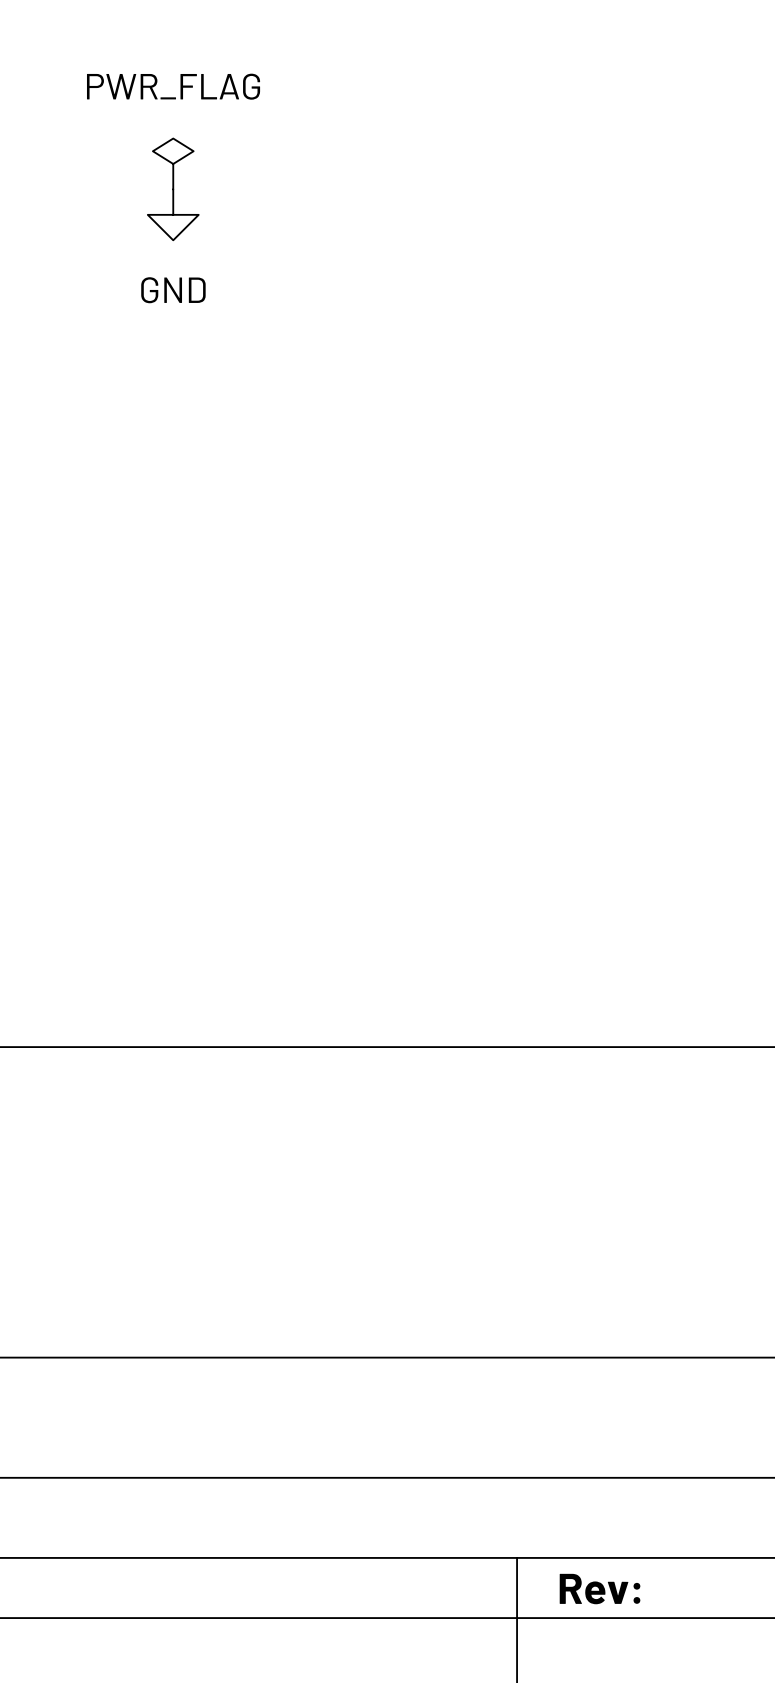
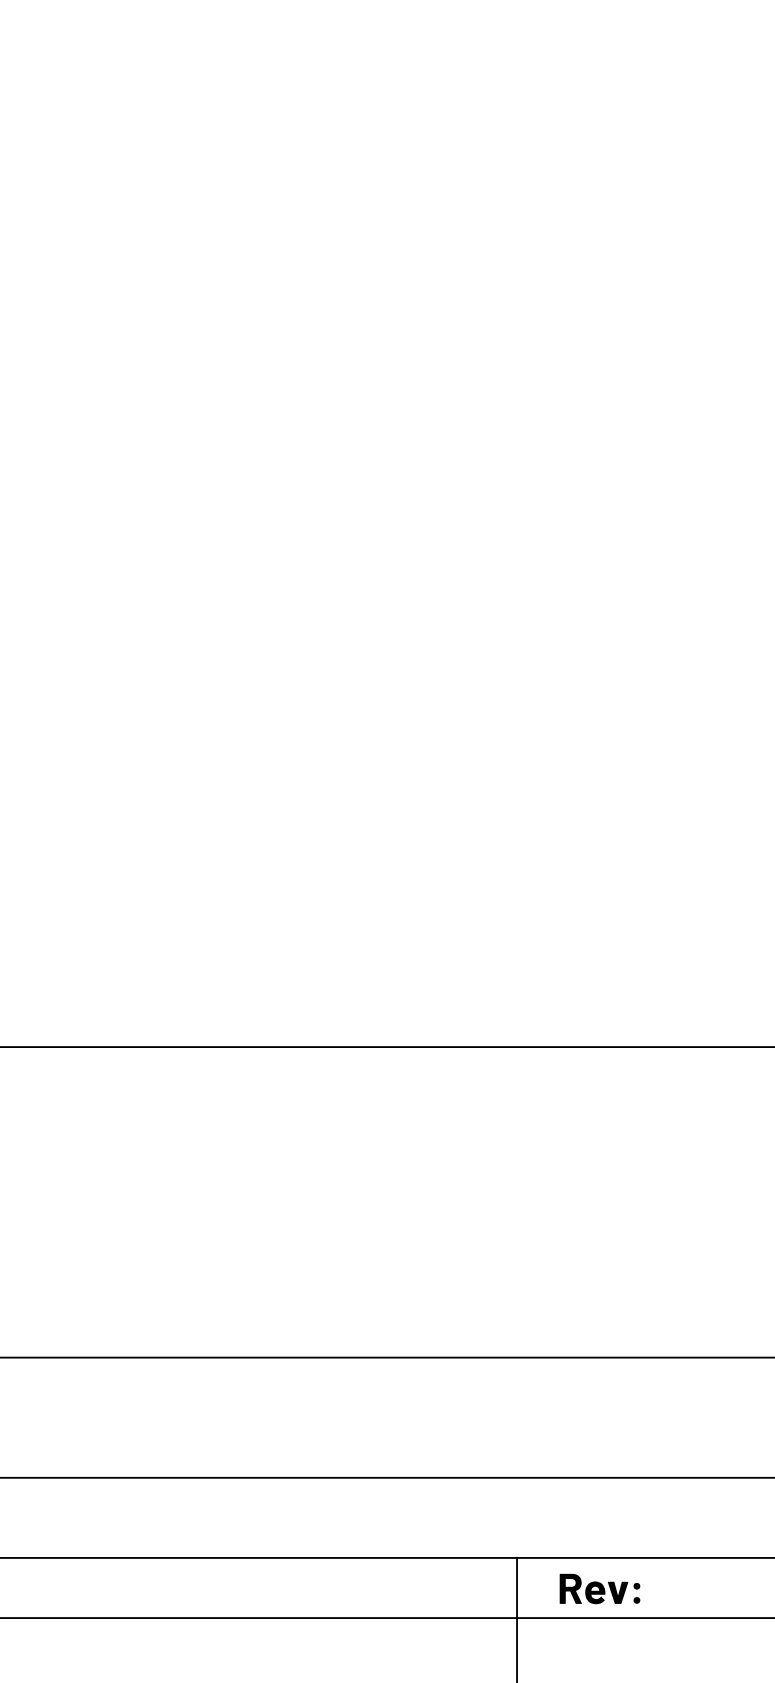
power symbol: PWR_FLAG (173, 163) -> none
power symbol: GND (173, 214) -> none

